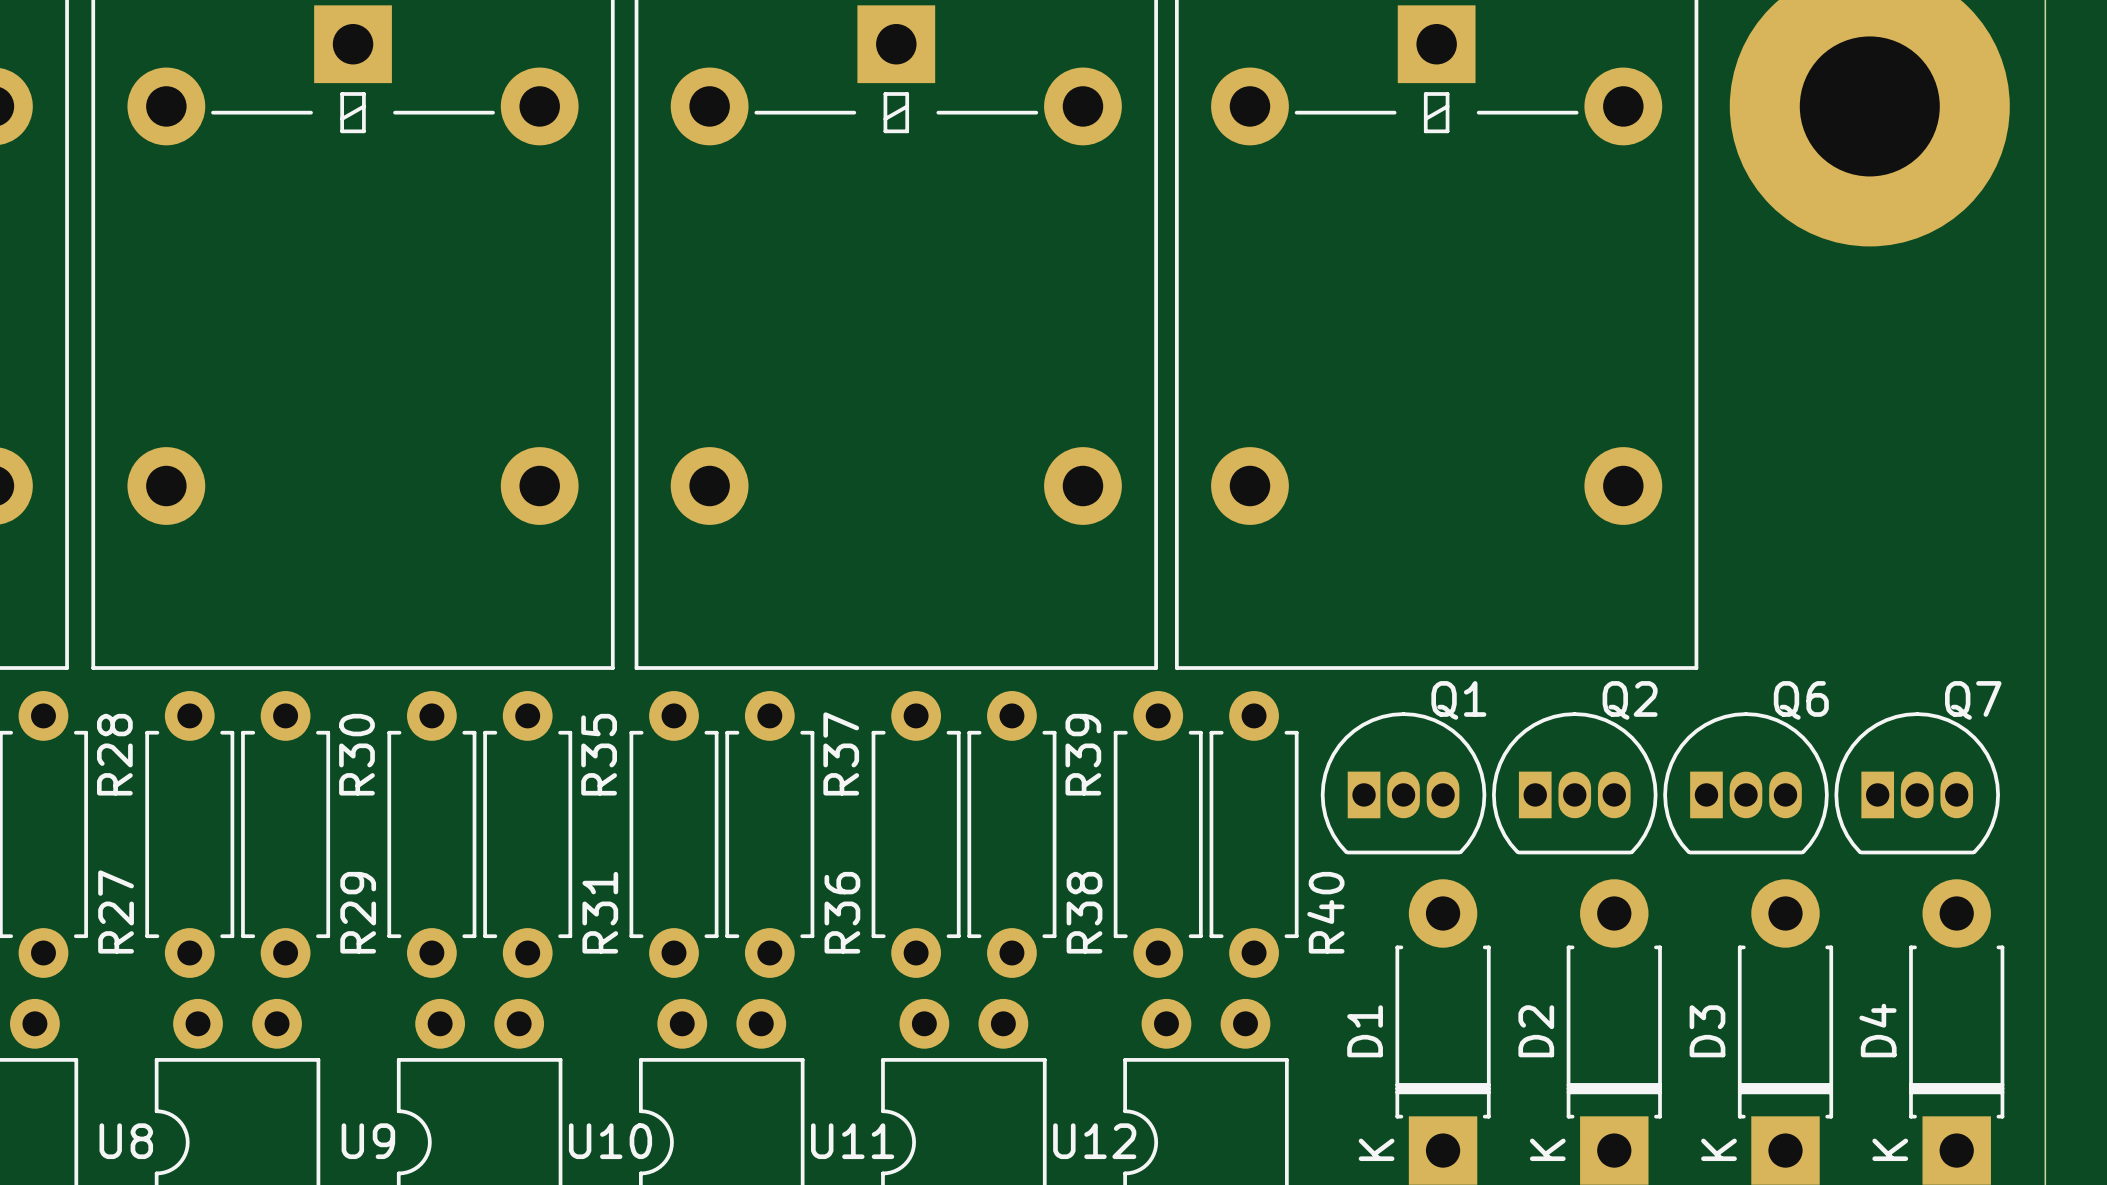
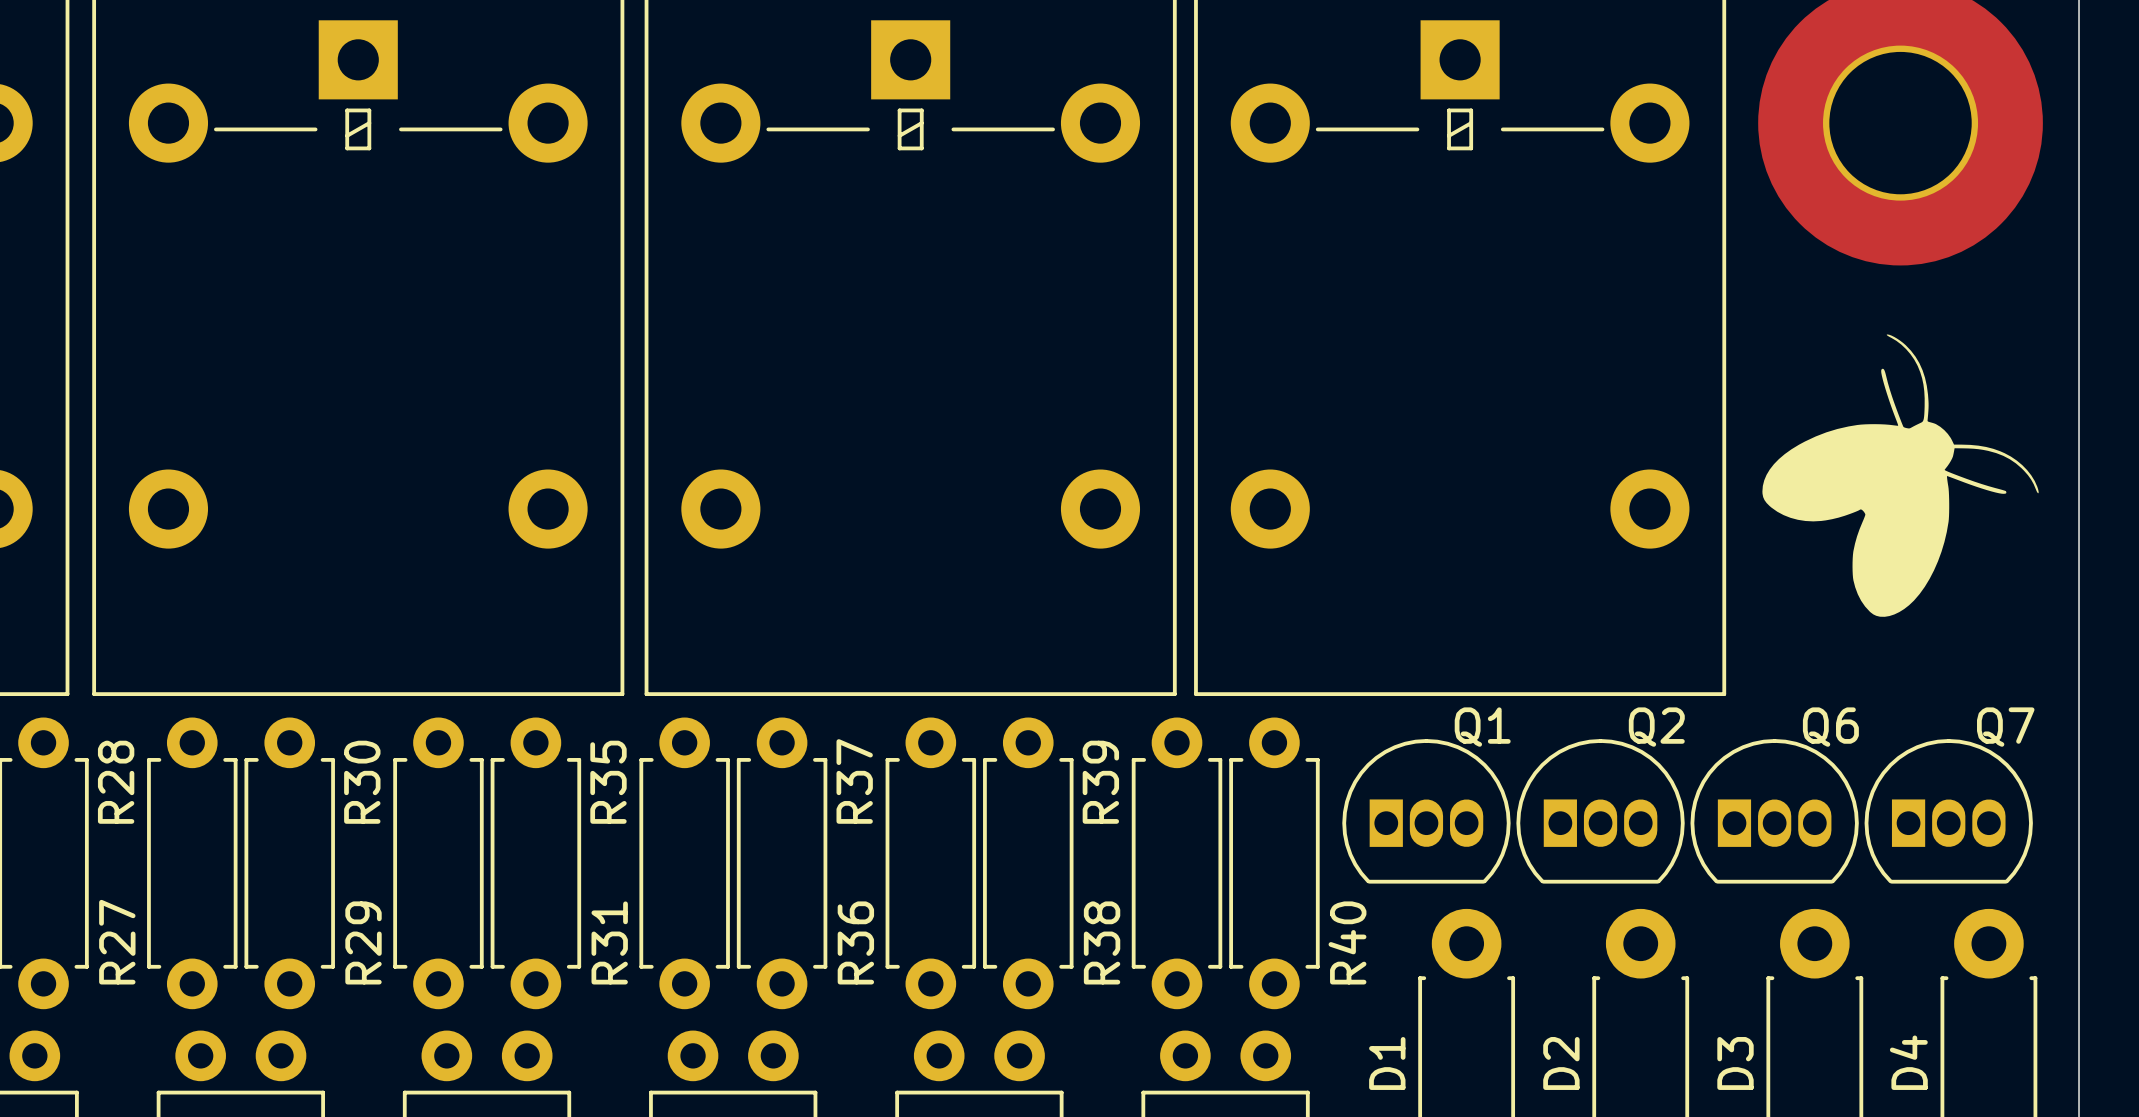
drawing: none -> [1762, 334, 2039, 617]

